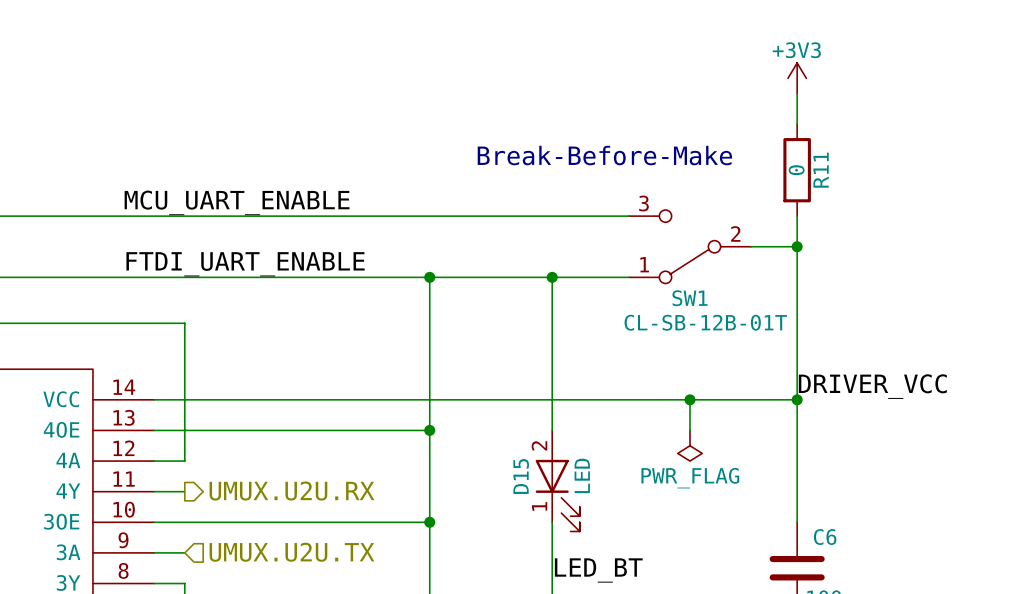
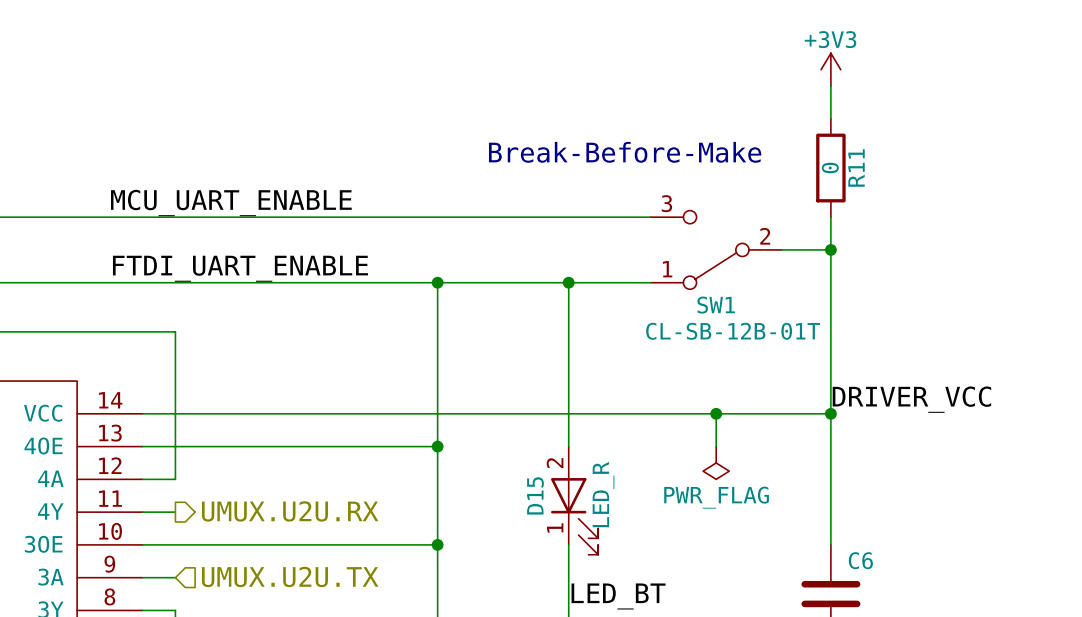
D15 value: LED (582, 475) -> LED_R (603, 494)

